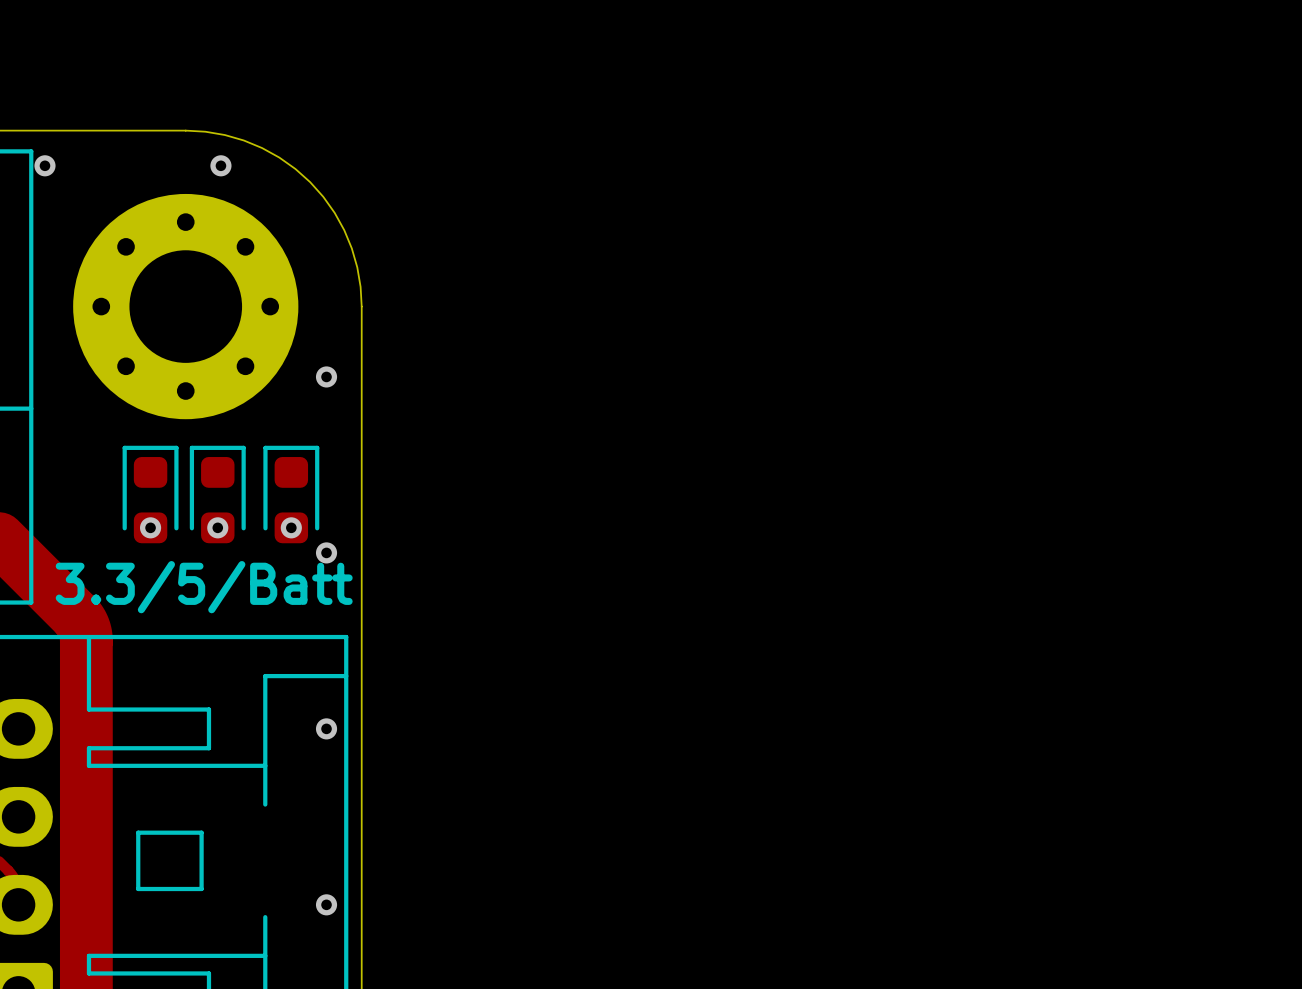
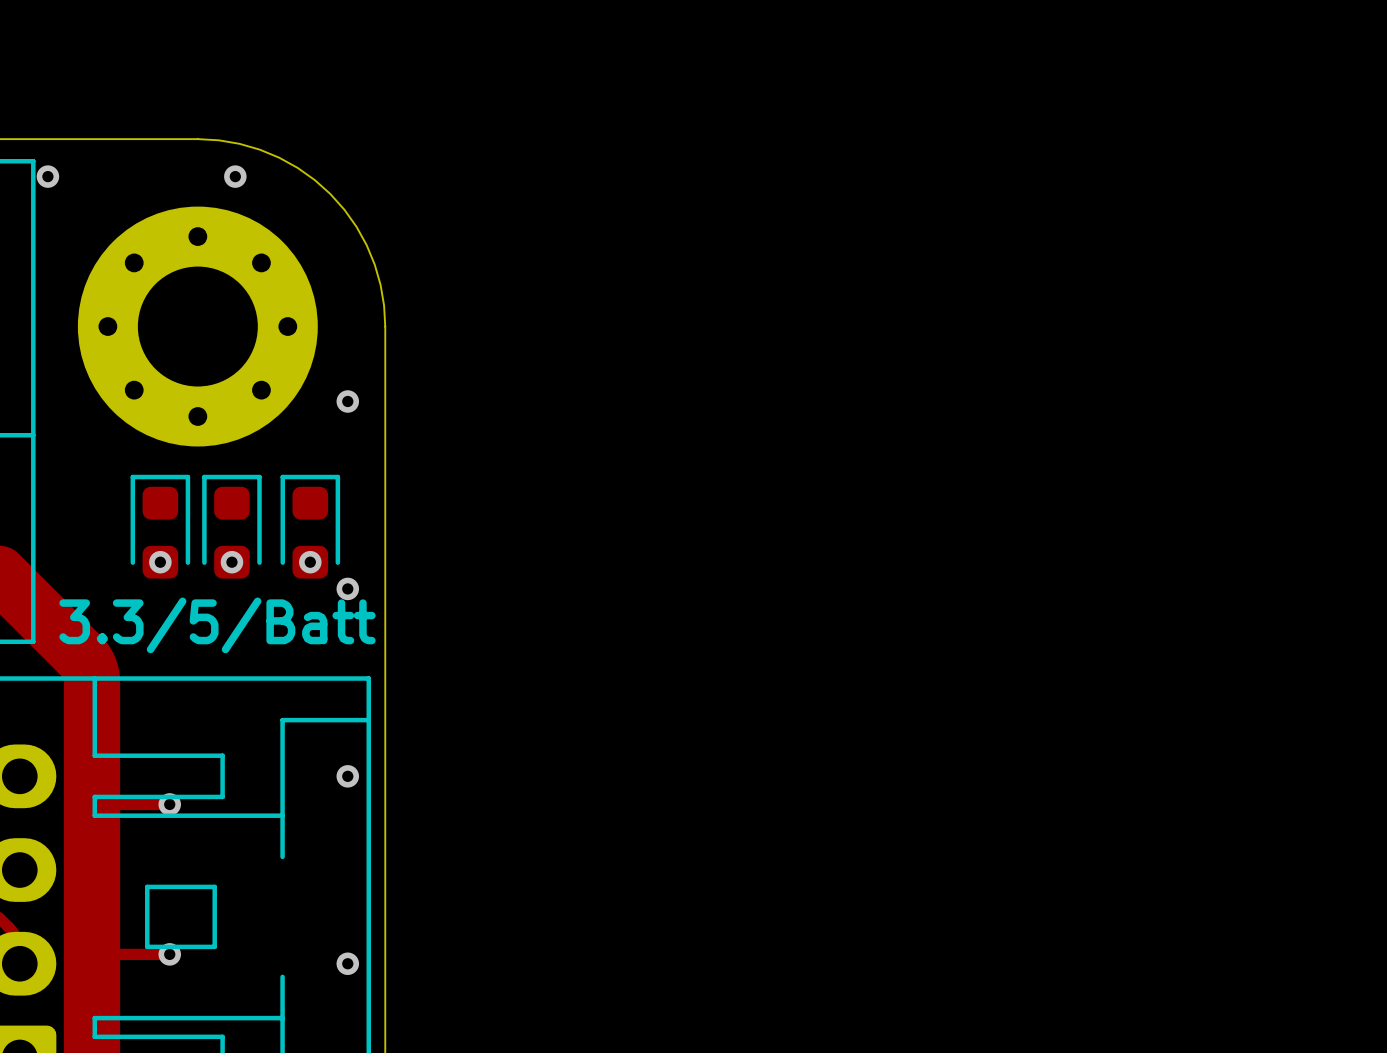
track: none -> (169, 804) (107, 804) (98, 807) (91, 813)
via: none -> (169, 804)
track: none -> (91, 954) (169, 954)
via: none -> (169, 954)

